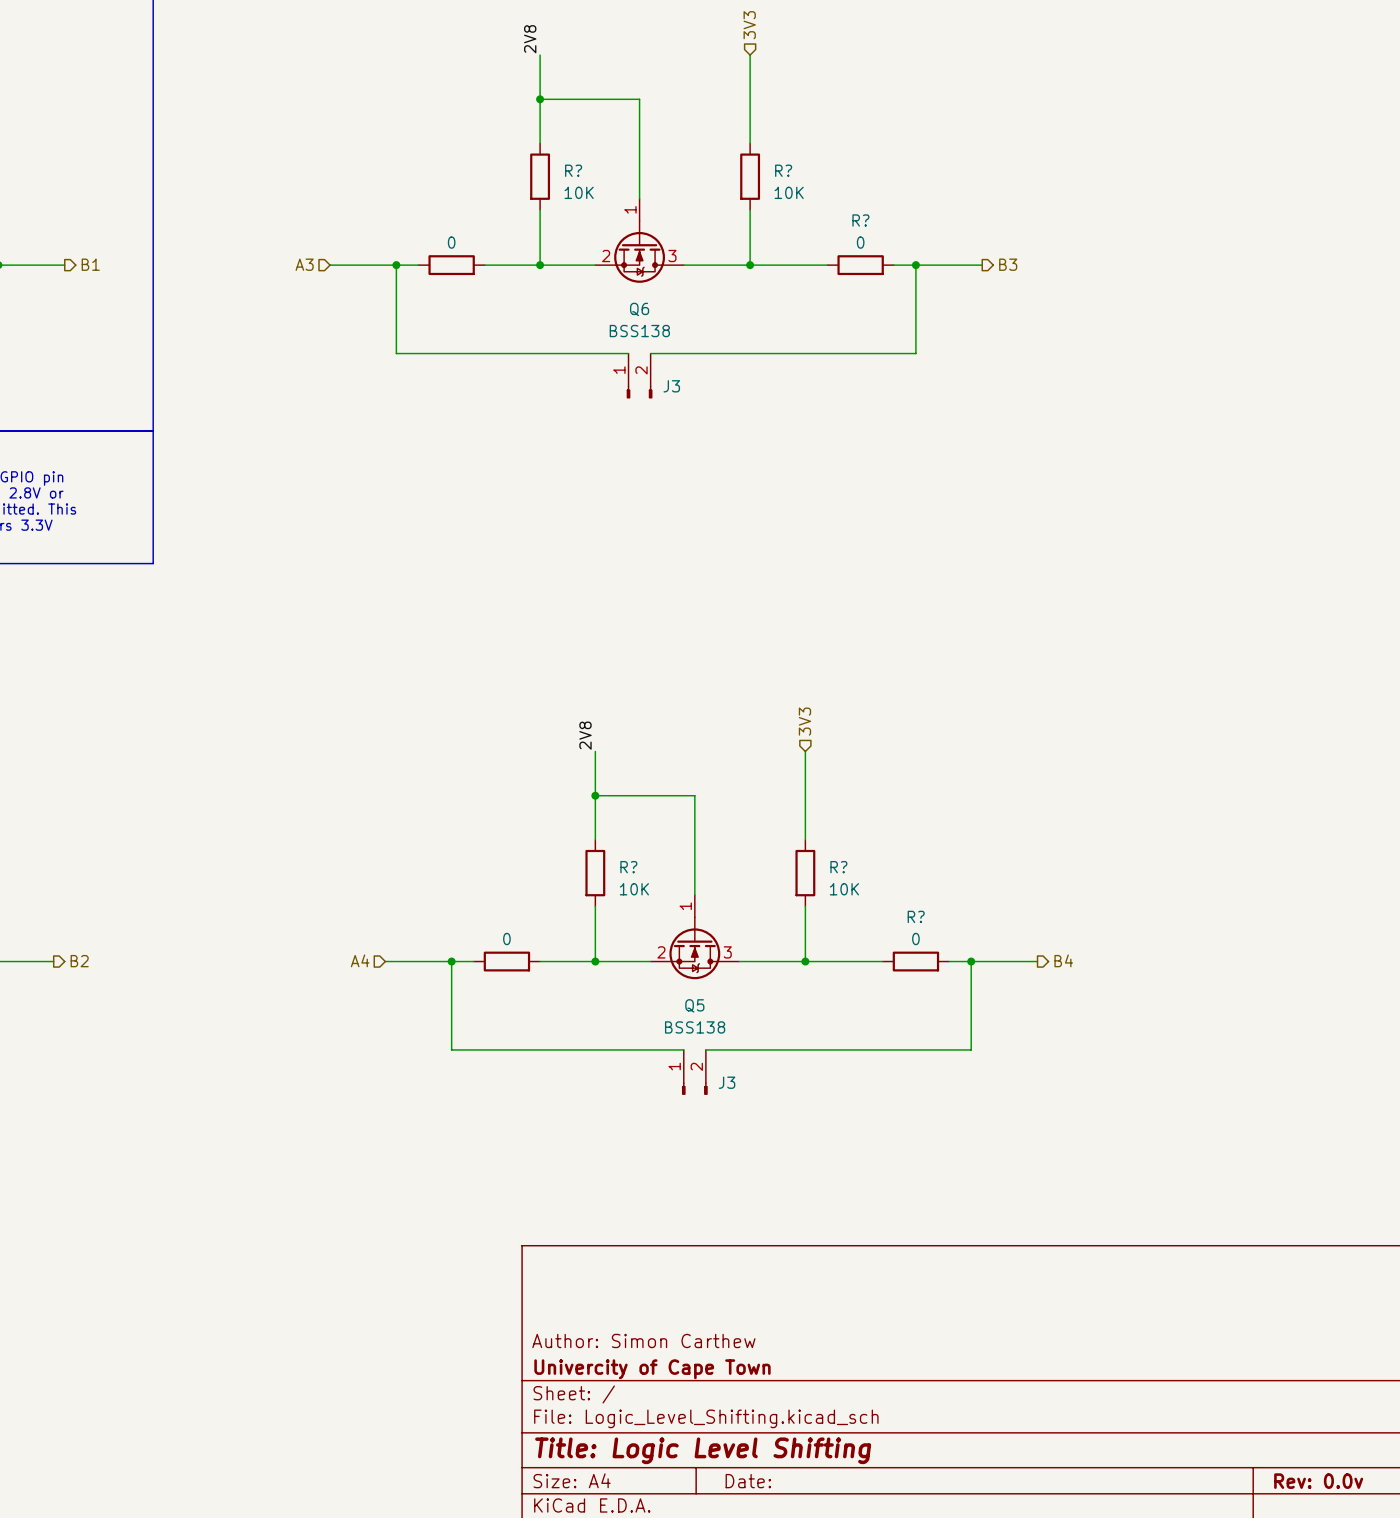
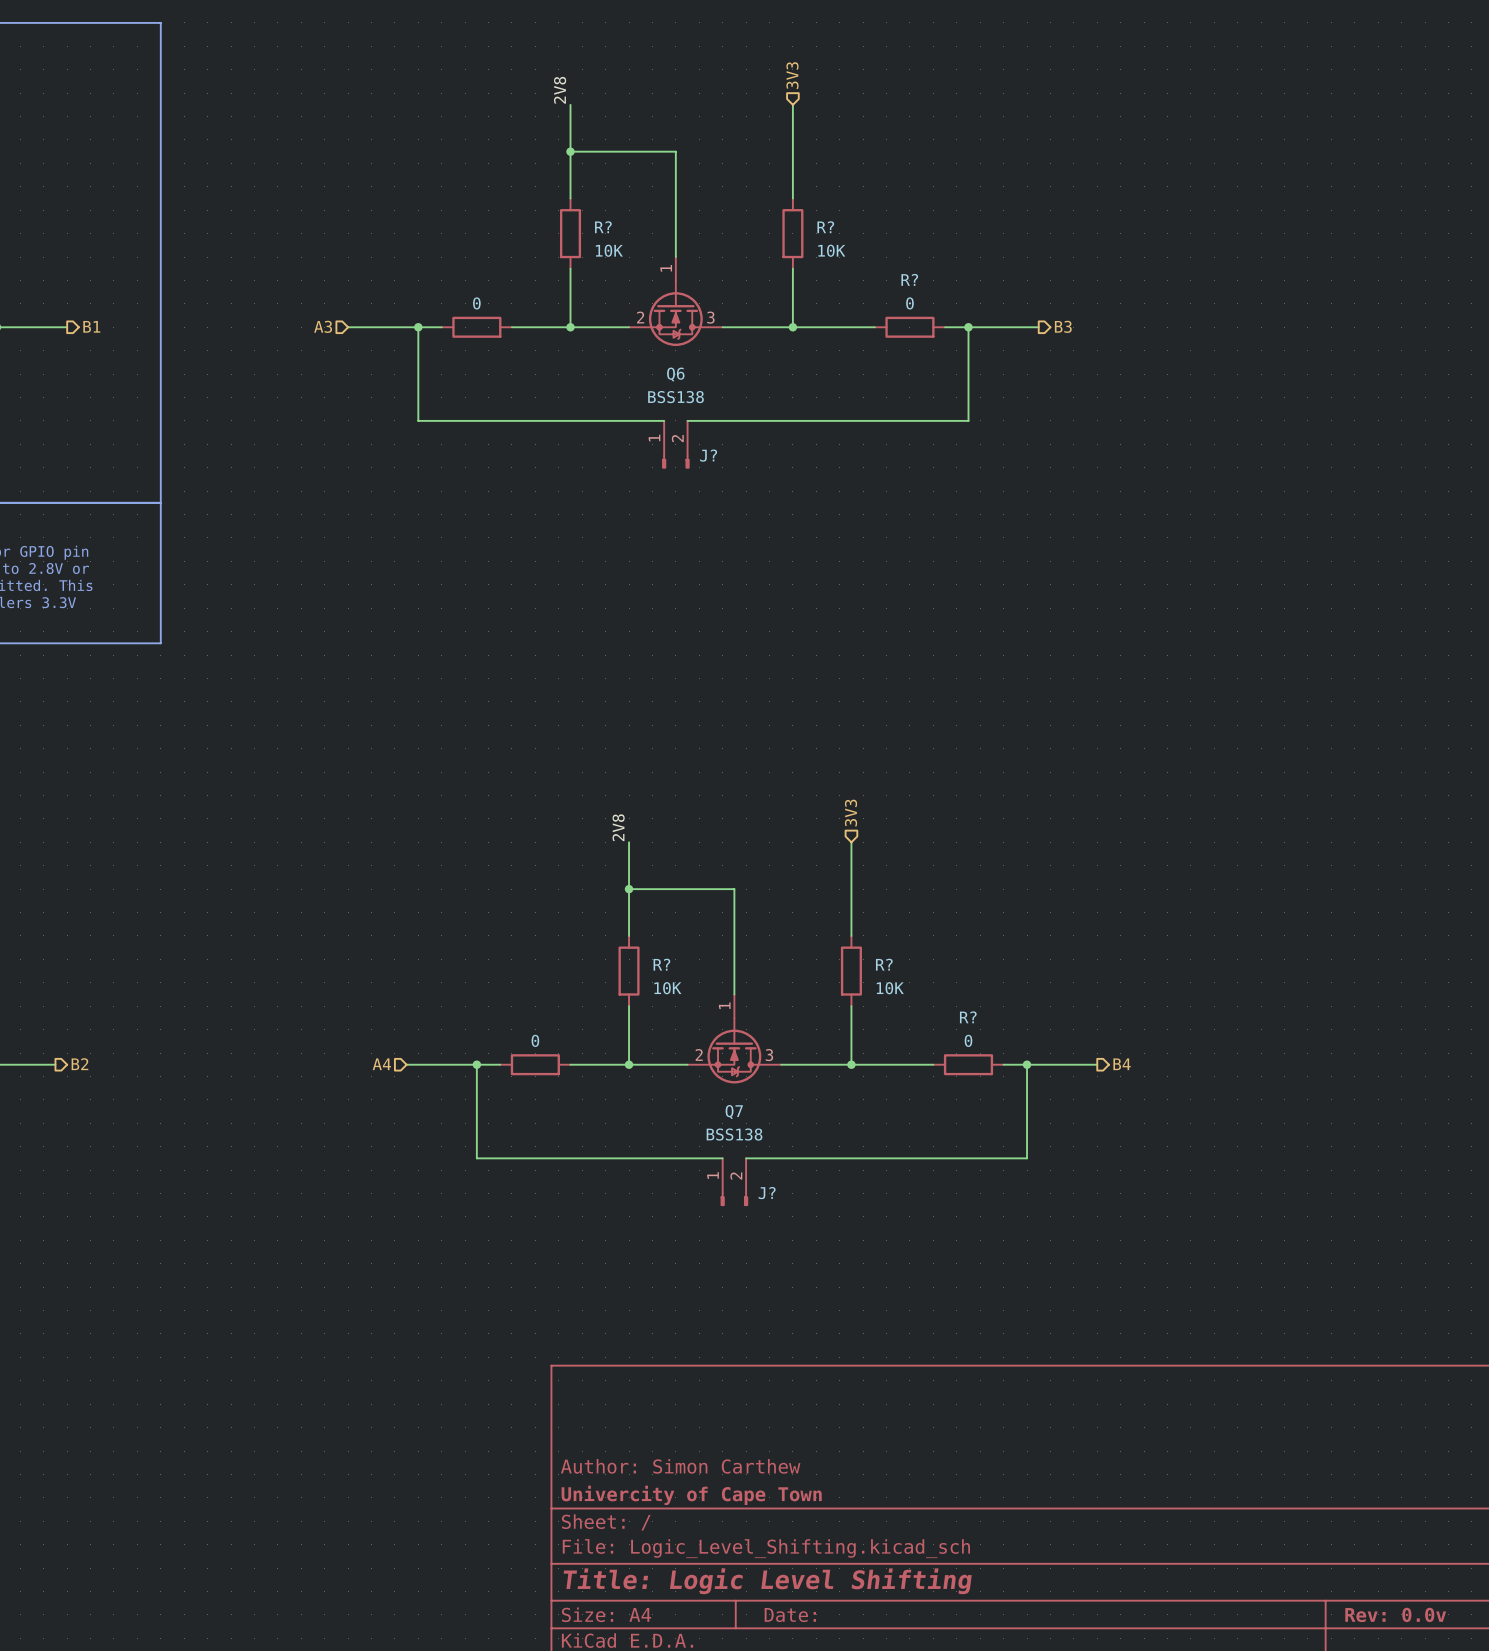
J3 name: J3 (671, 386) -> J? (708, 455)
Q5 name: Q5 (694, 1005) -> Q7 (734, 1112)
J3 name: J3 (727, 1082) -> J? (767, 1193)

